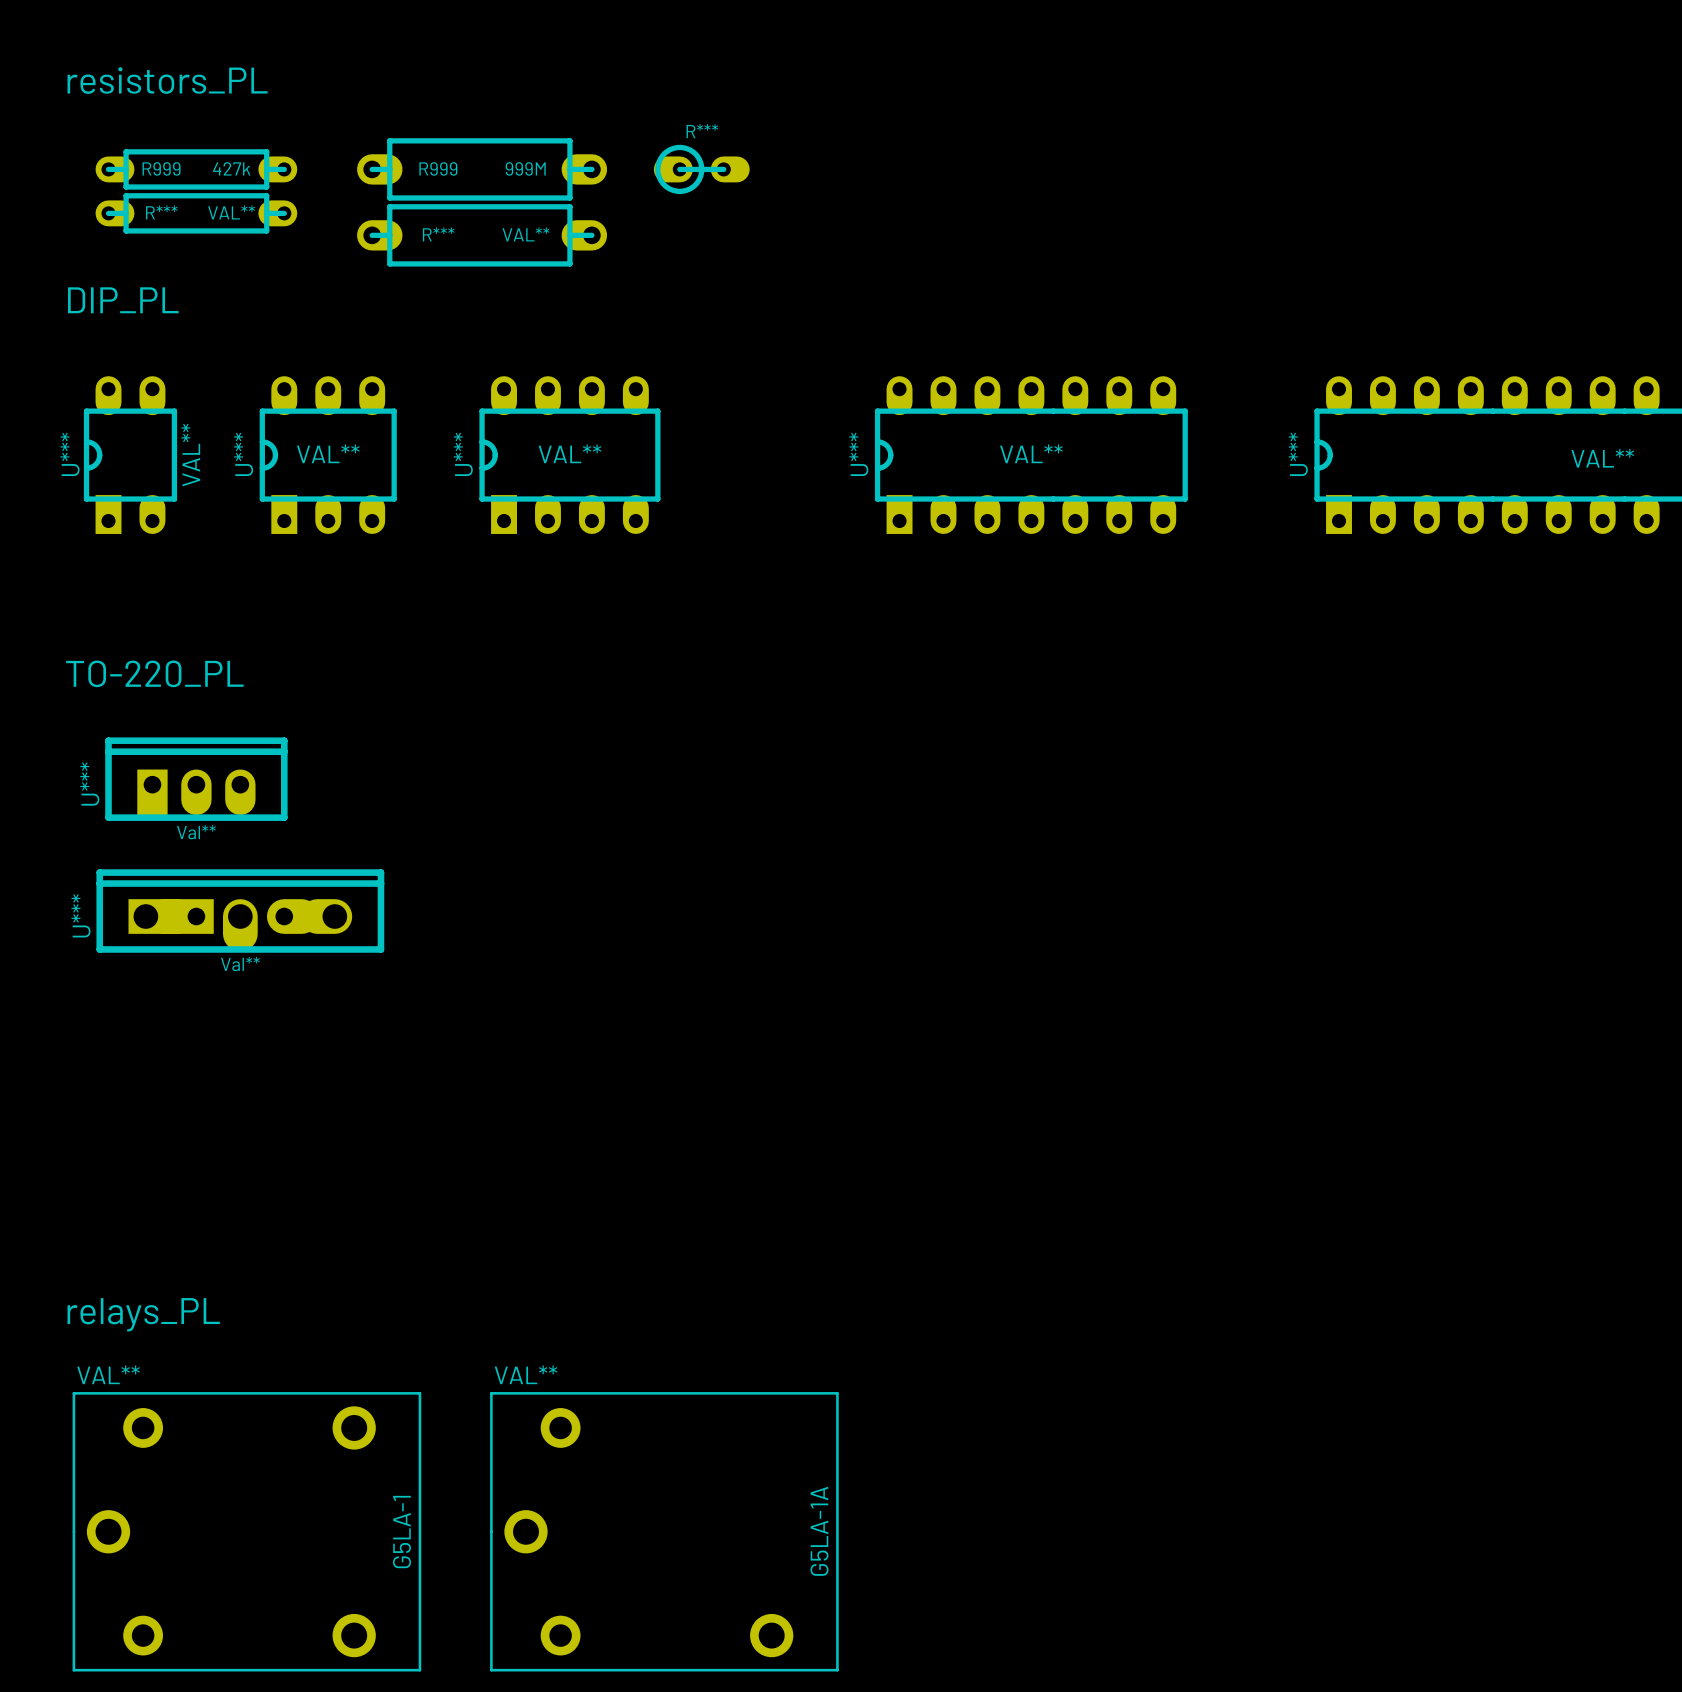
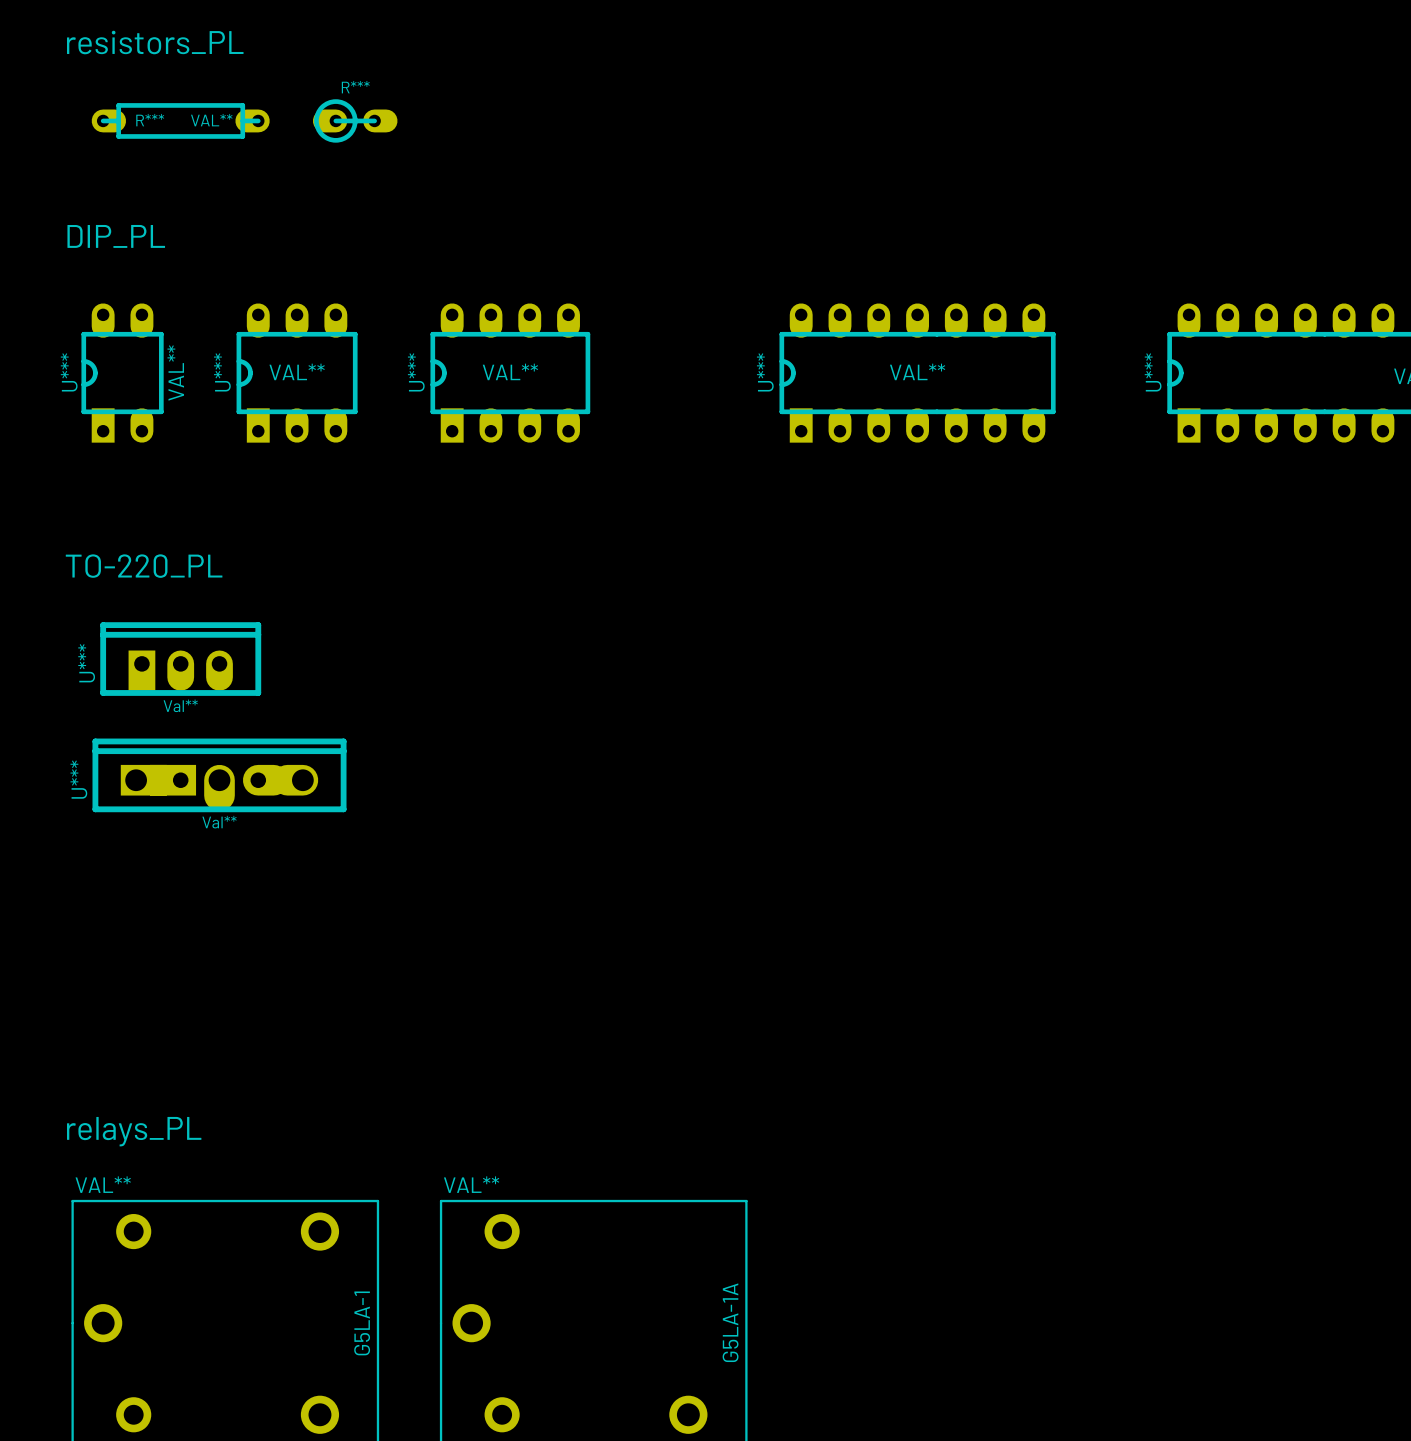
R999 name: R999 (161, 168) -> R*** (150, 120)
R999 value: 427k (231, 168) -> VAL** (211, 120)
R999: 999M (482, 169) -> none
R*** position: (701, 169) -> (355, 120)
R***: VAL** (196, 213) -> none
R***: VAL** (482, 235) -> none

